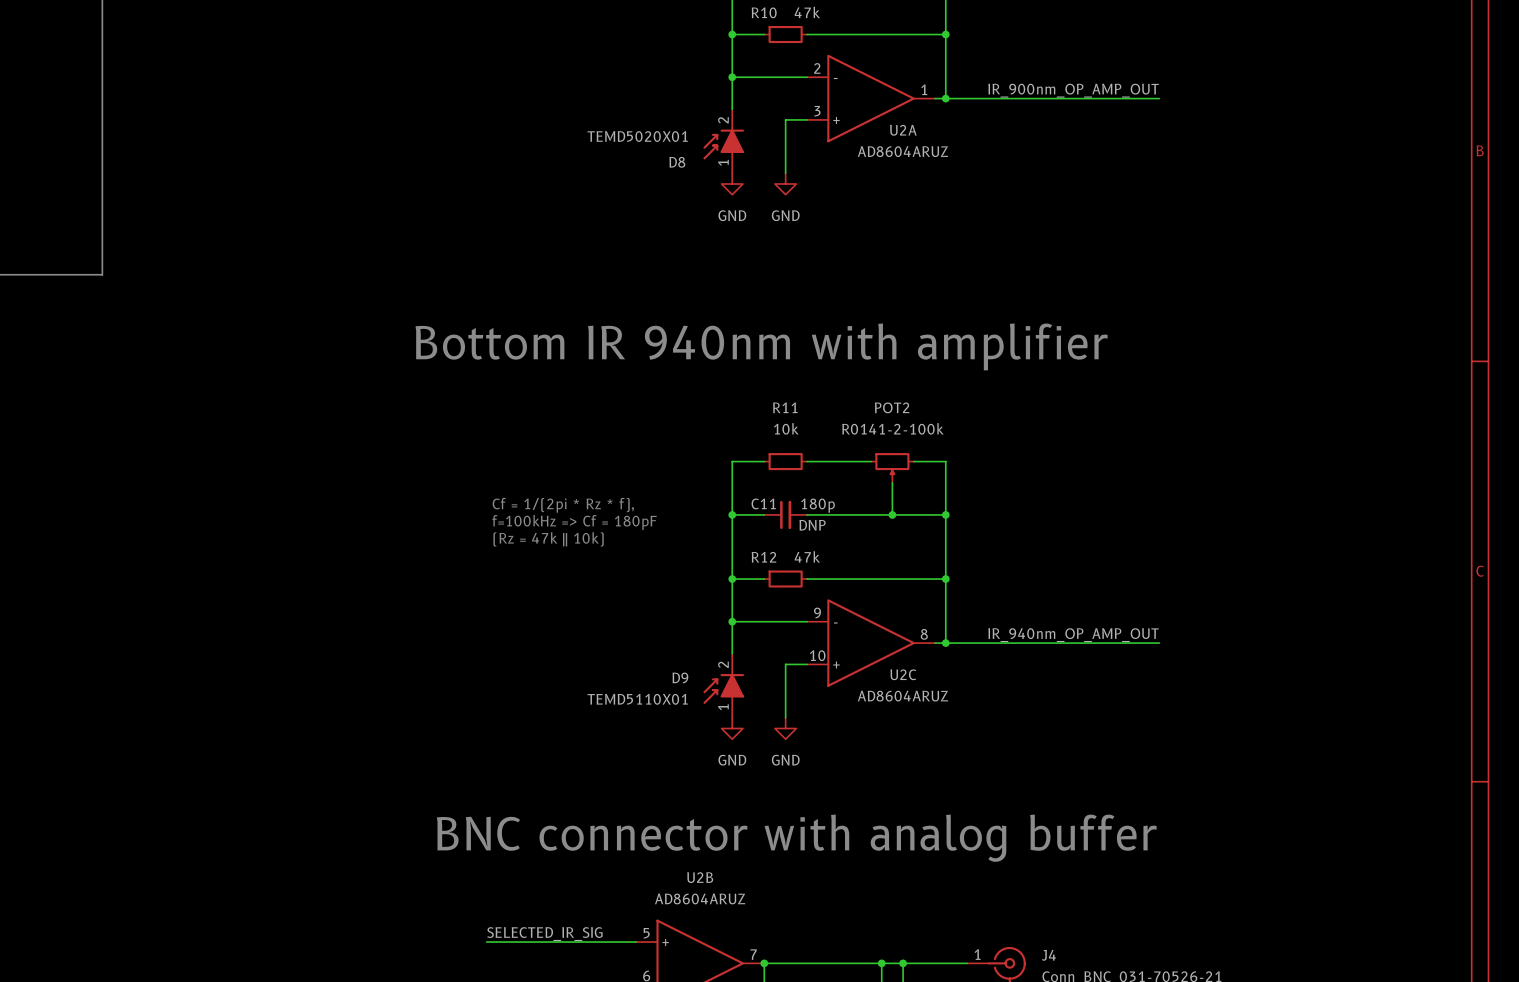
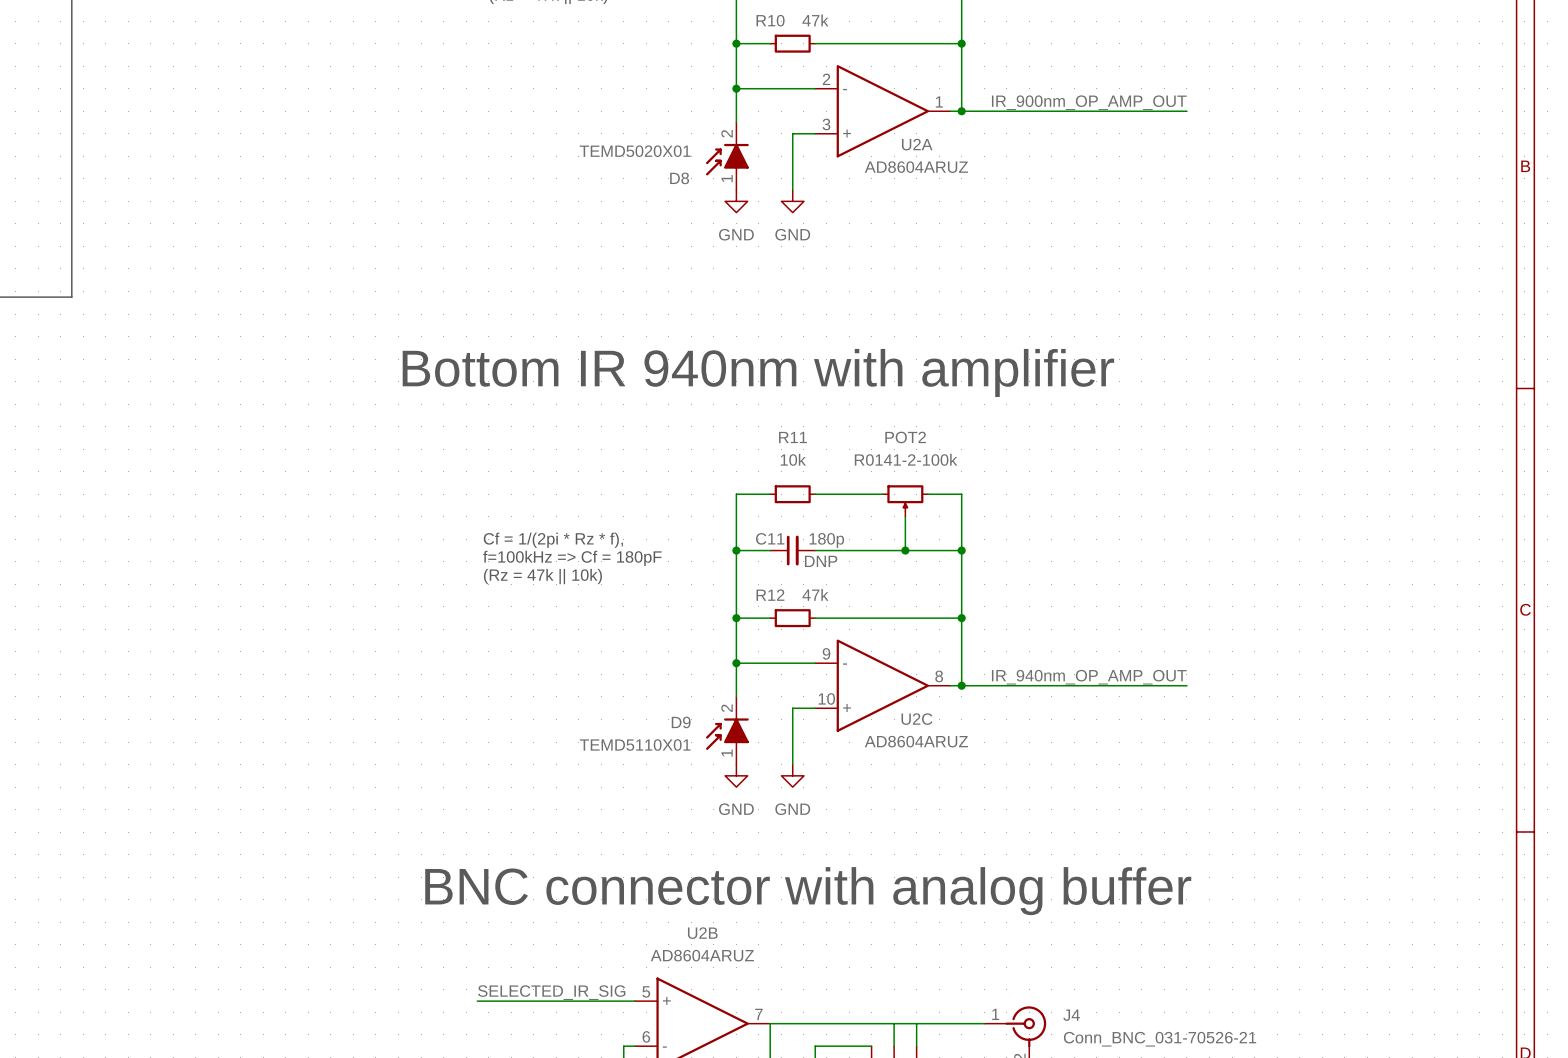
junction: (764, 963) -> none
junction: (881, 963) -> none
junction: (903, 963) -> none

